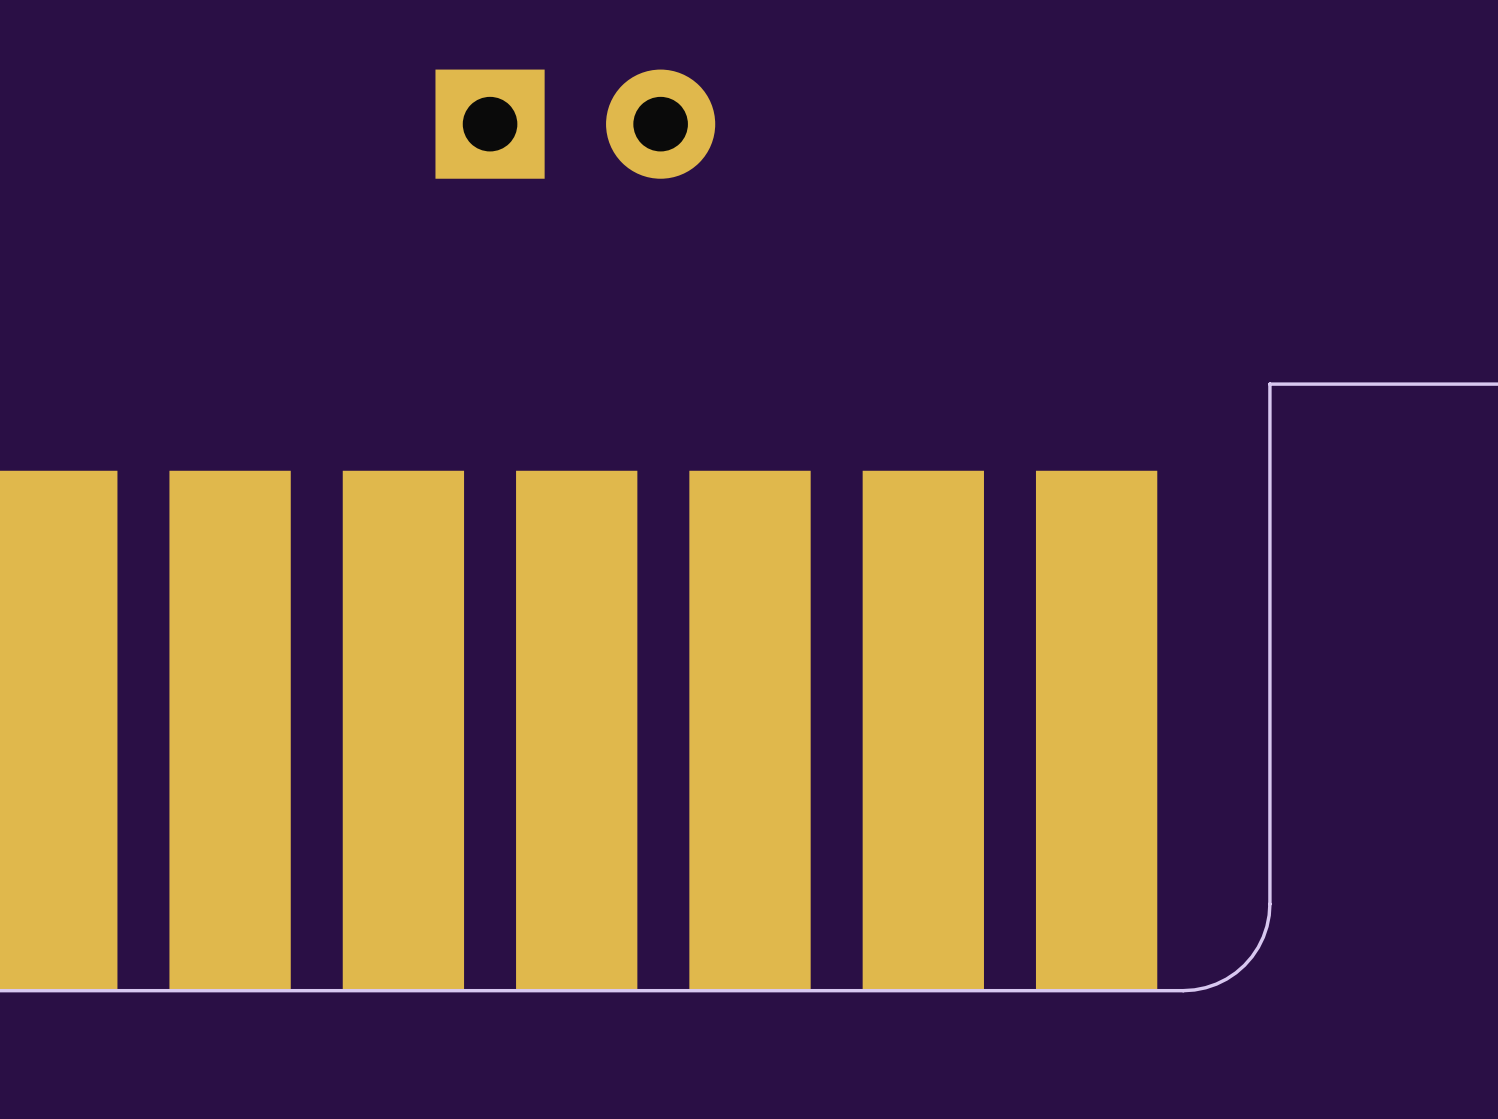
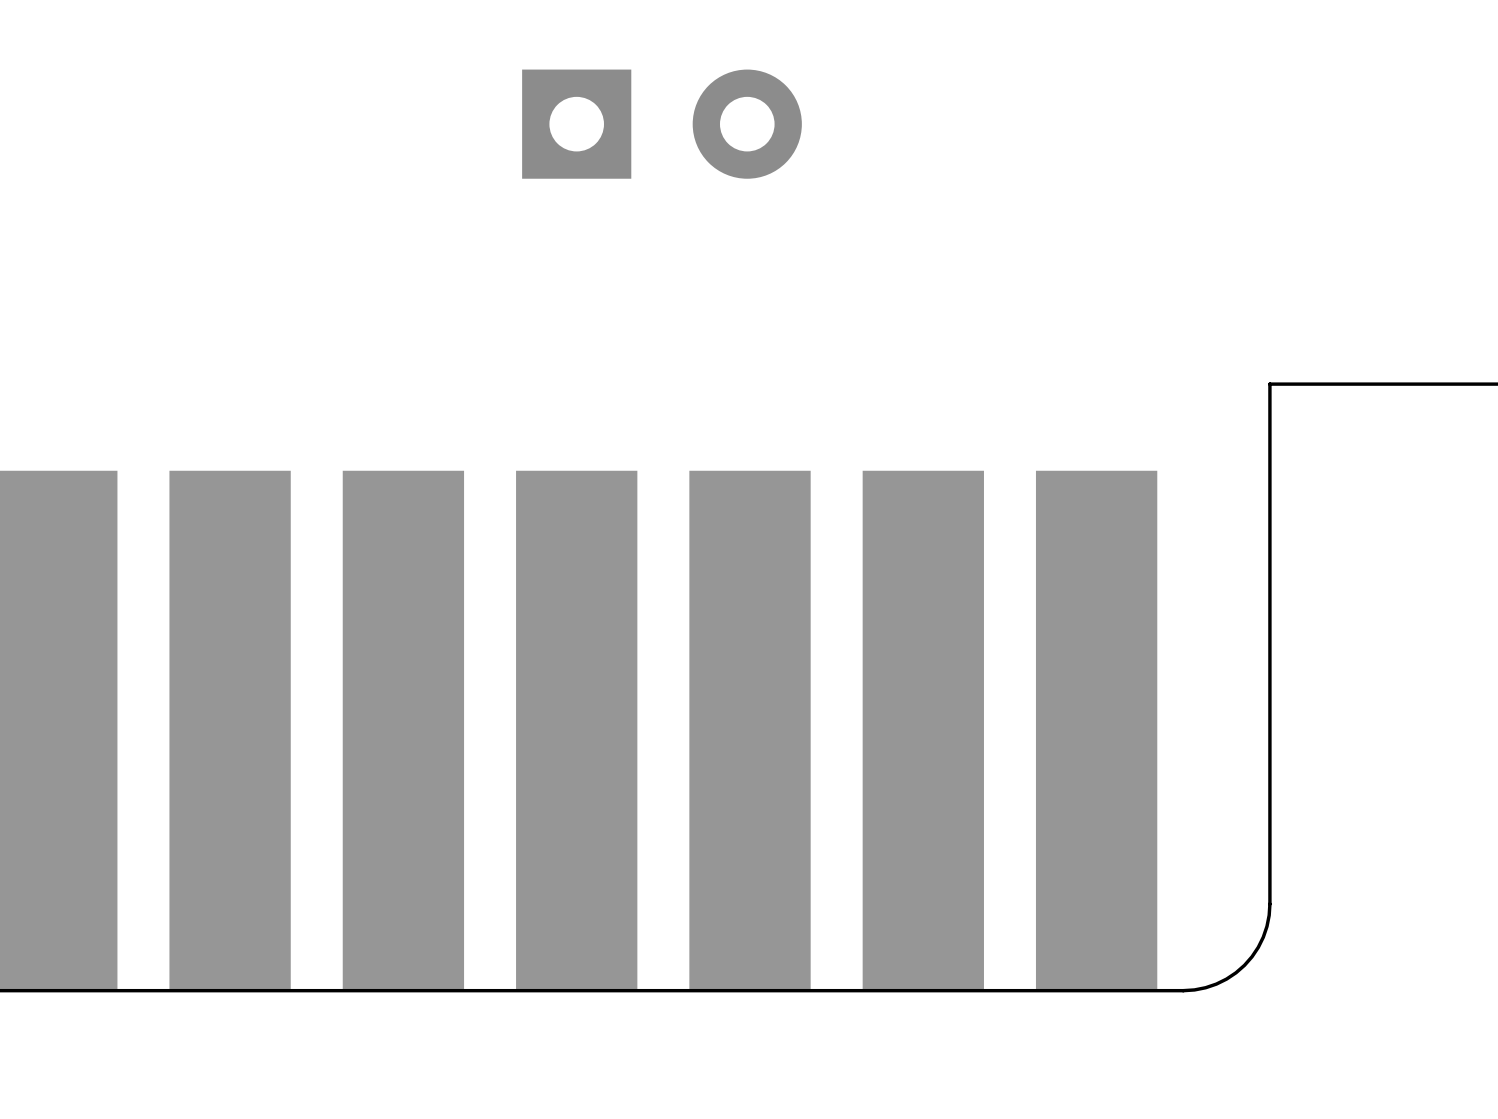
part position: (575, 124) -> (661, 124)

